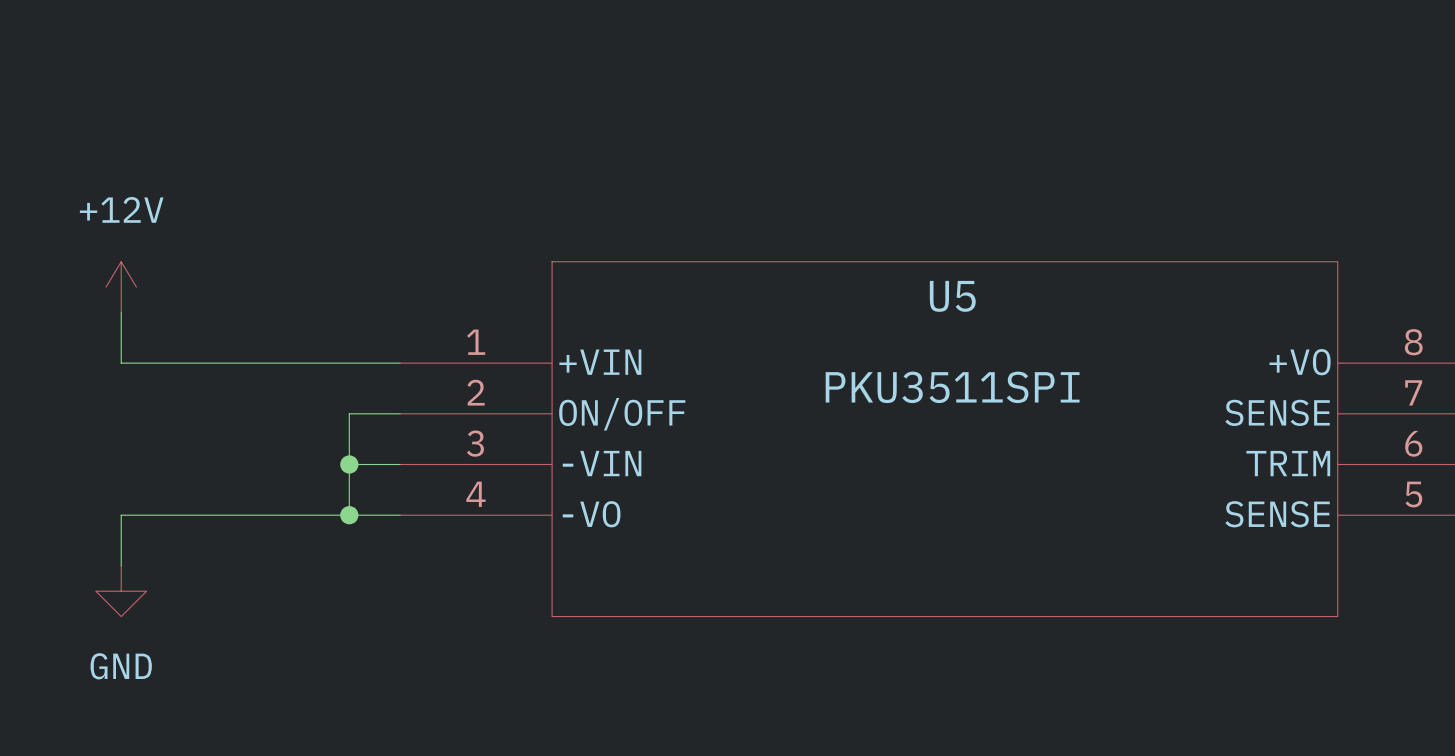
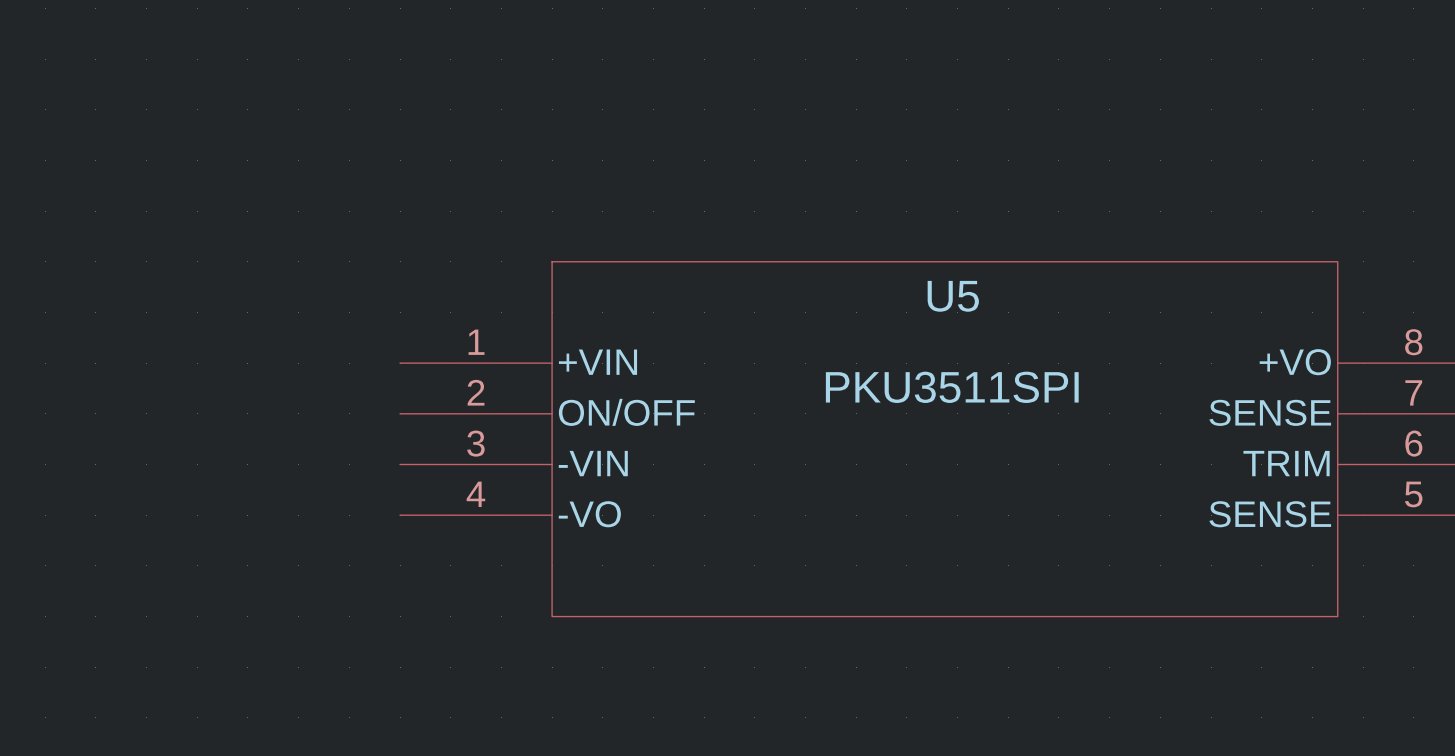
power symbol: +12V (121, 287) -> none
wire: (121, 312) (121, 363) (400, 363) -> none
wire: (400, 413) (349, 413) (349, 515) -> none
wire: (349, 464) (400, 464) -> none
junction: (349, 464) -> none
junction: (349, 515) -> none
wire: (400, 515) (121, 515) (121, 565) -> none
power symbol: GND (121, 591) -> none

